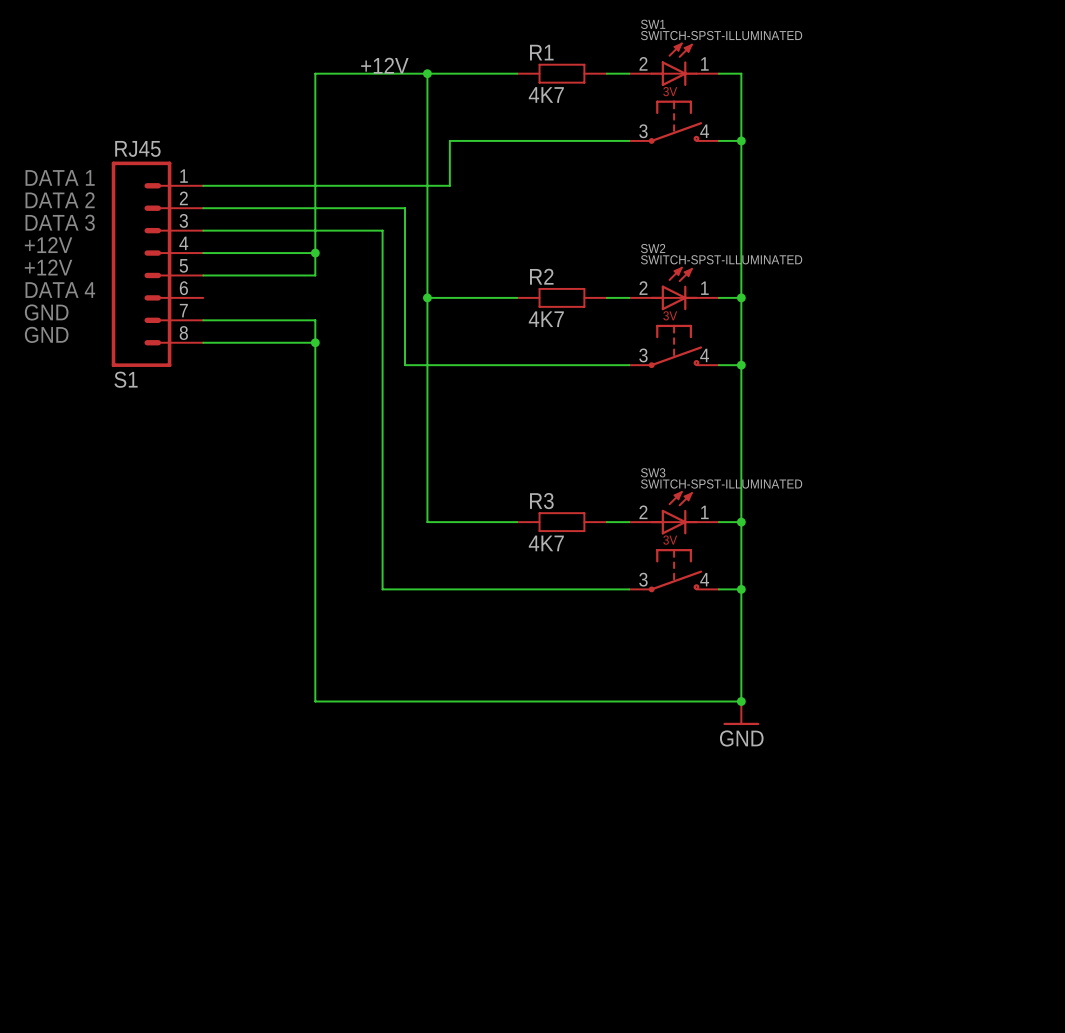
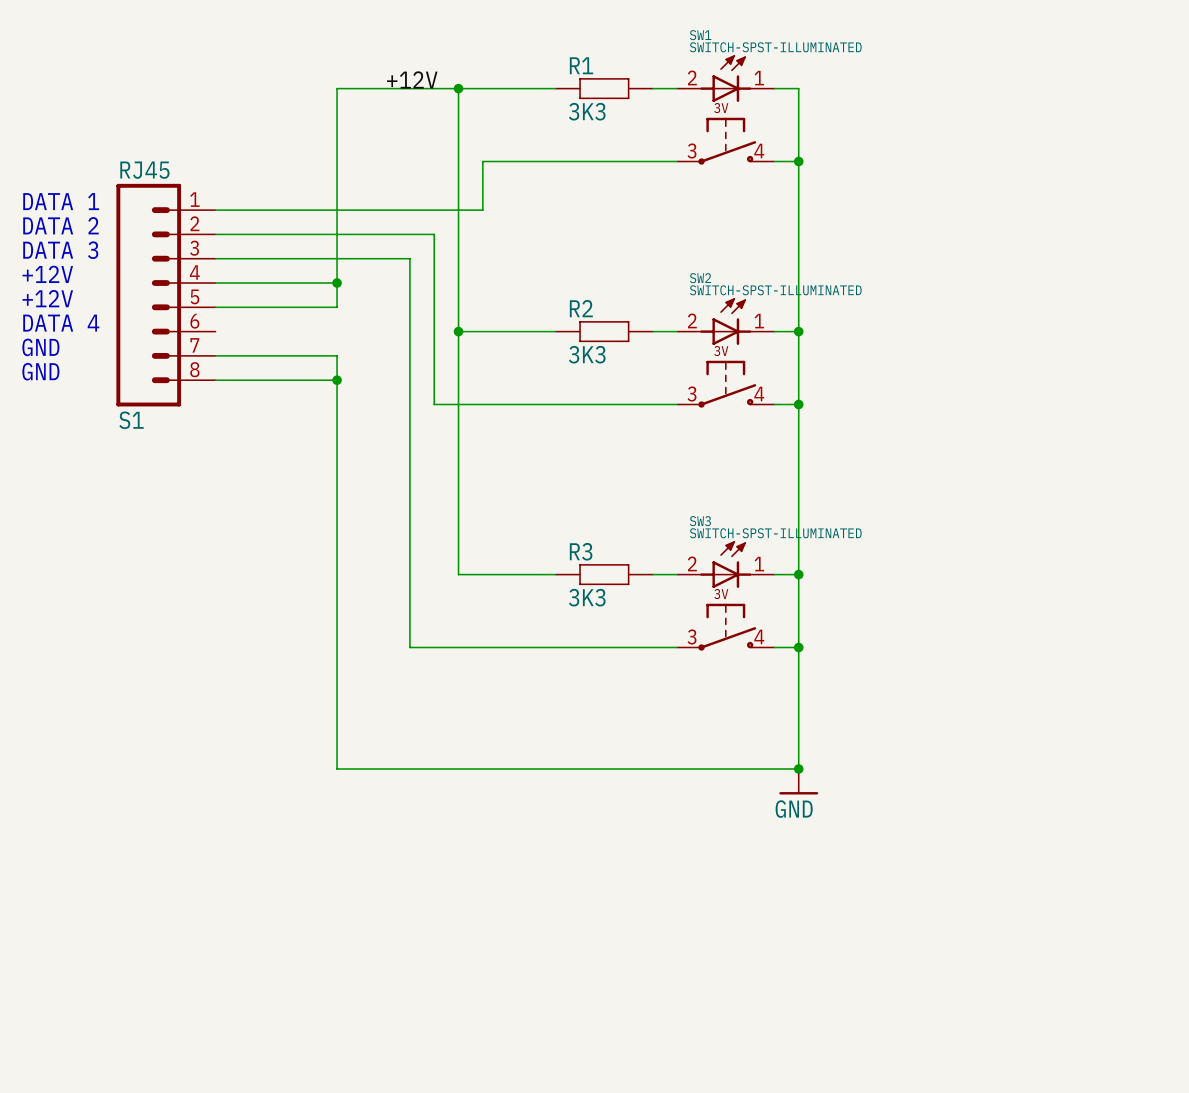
R1 value: 4K7 (546, 94) -> 3K3 (587, 111)
R2 value: 4K7 (546, 319) -> 3K3 (587, 354)
R3 value: 4K7 (546, 543) -> 3K3 (587, 597)

